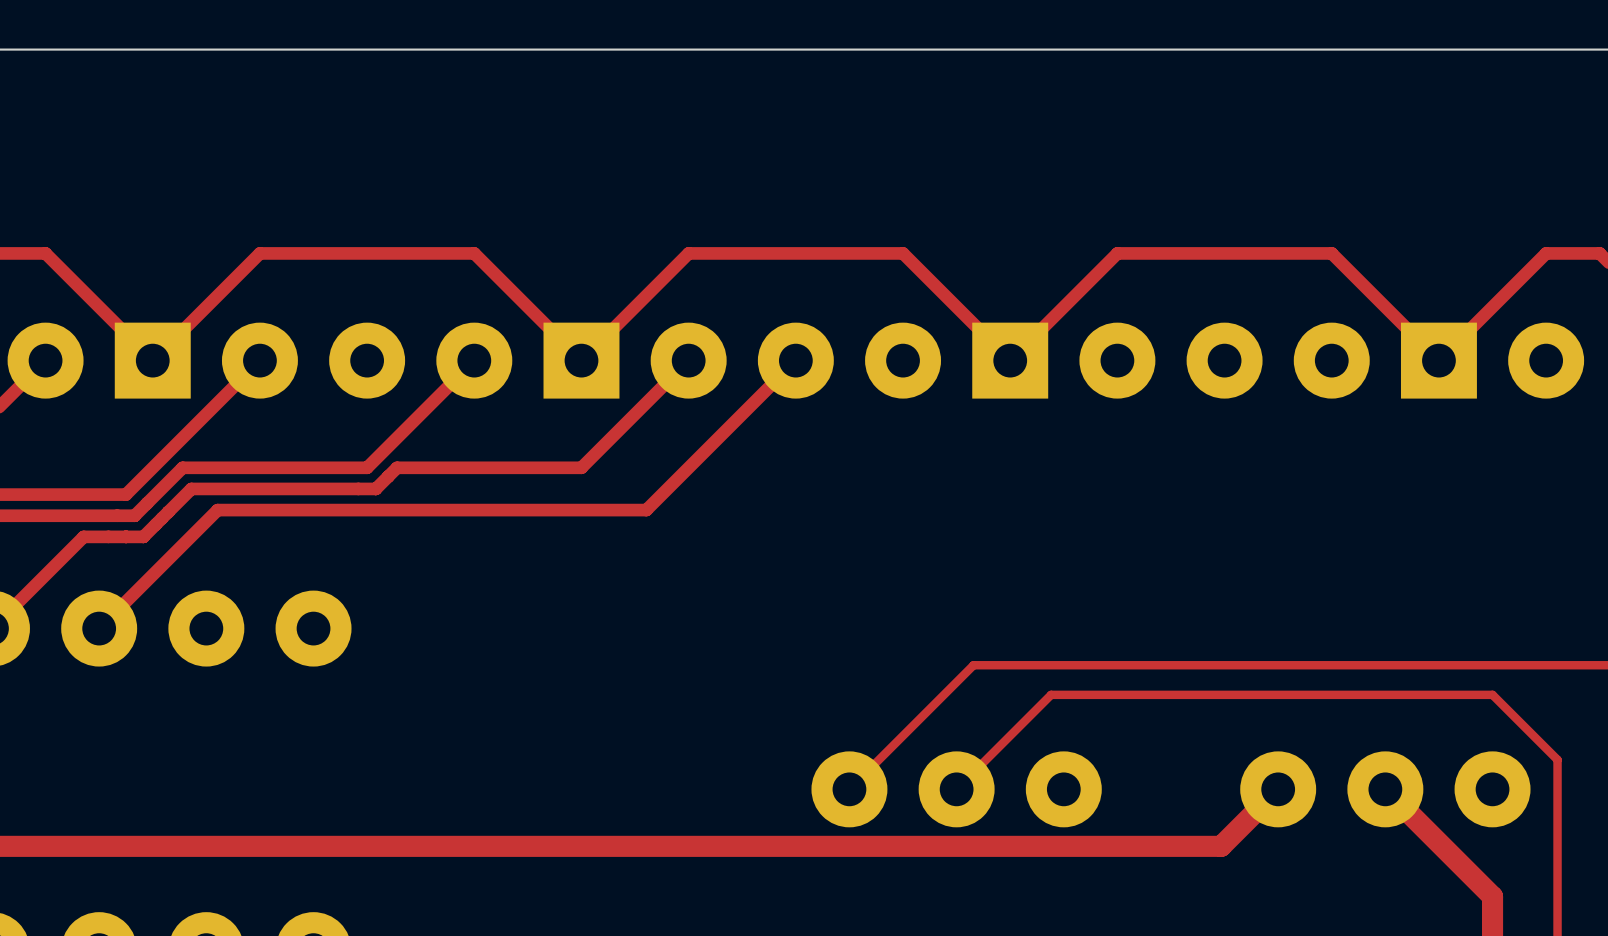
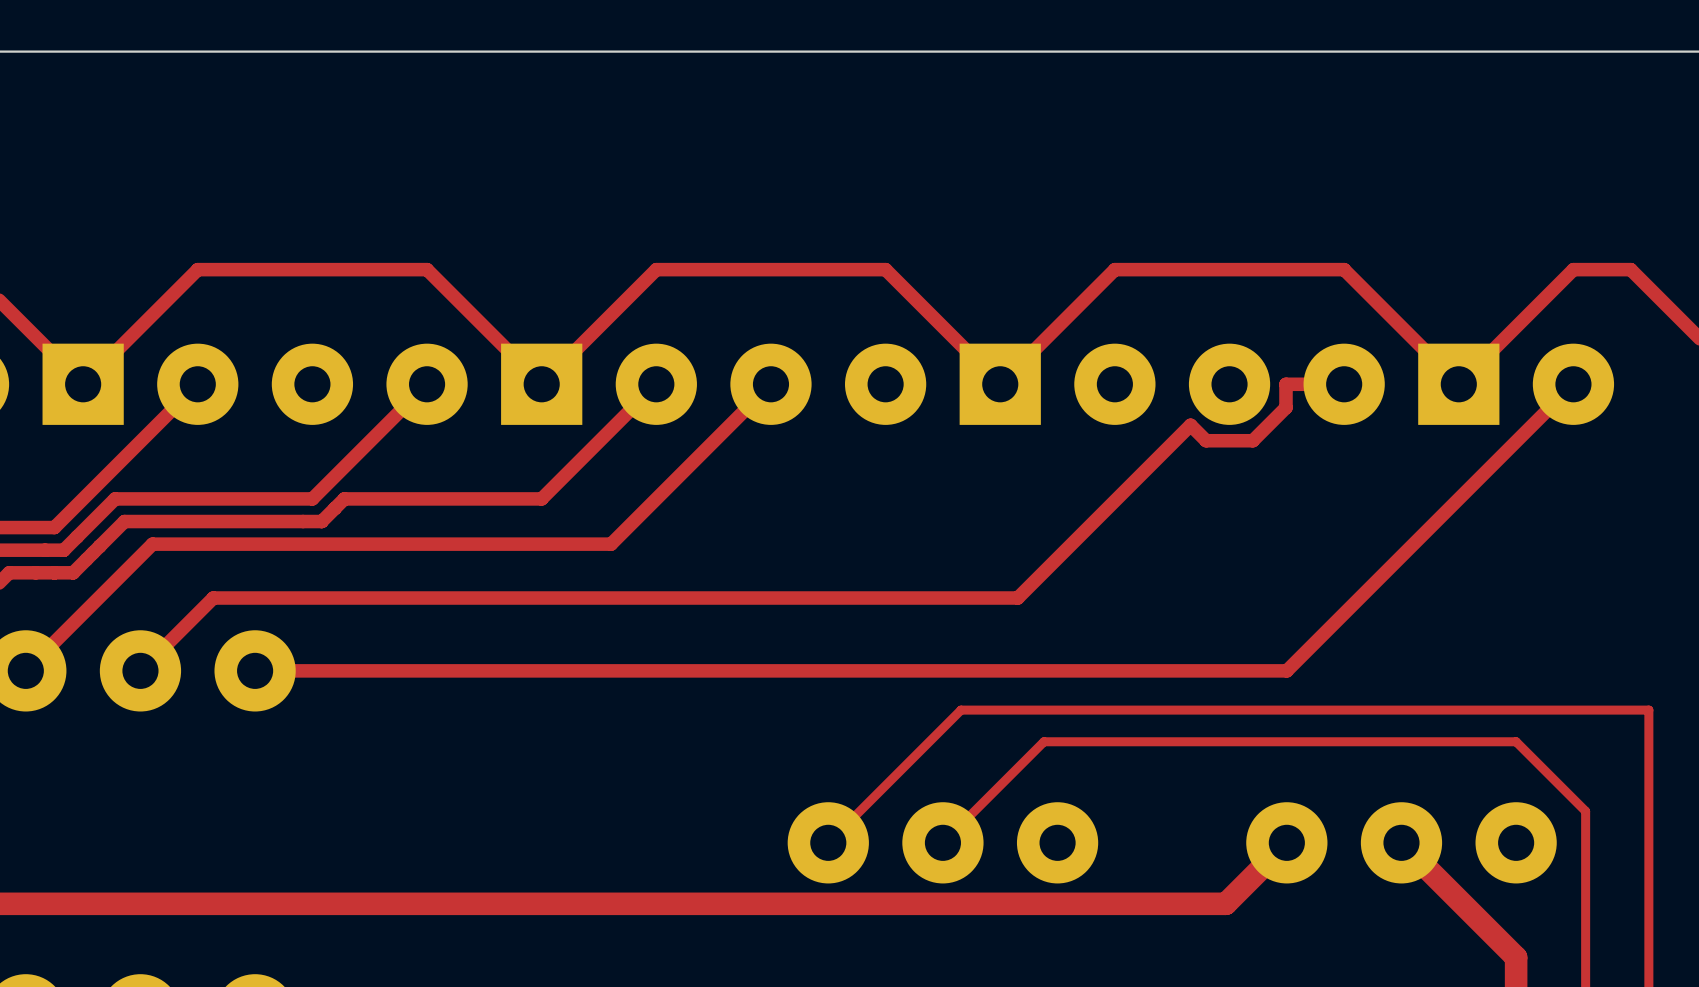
top track: none -> (1344, 384) (1285, 384) (1285, 407) (1252, 440) (1206, 440) (1190, 425) (1017, 598) (213, 598) (140, 670)
top track: none -> (1573, 384) (1286, 670) (255, 670)

